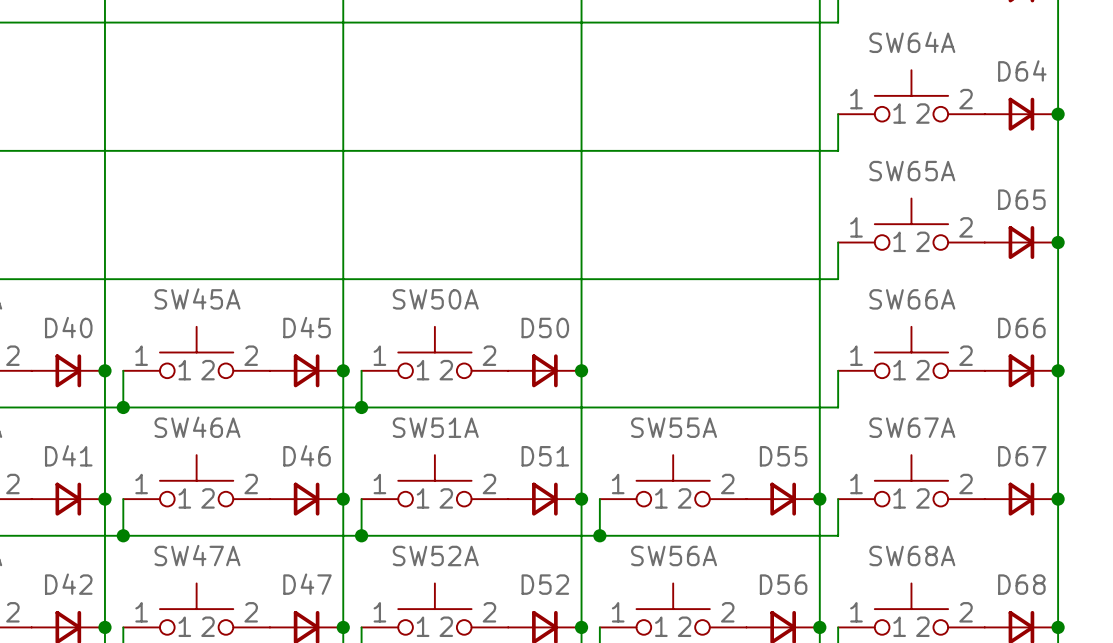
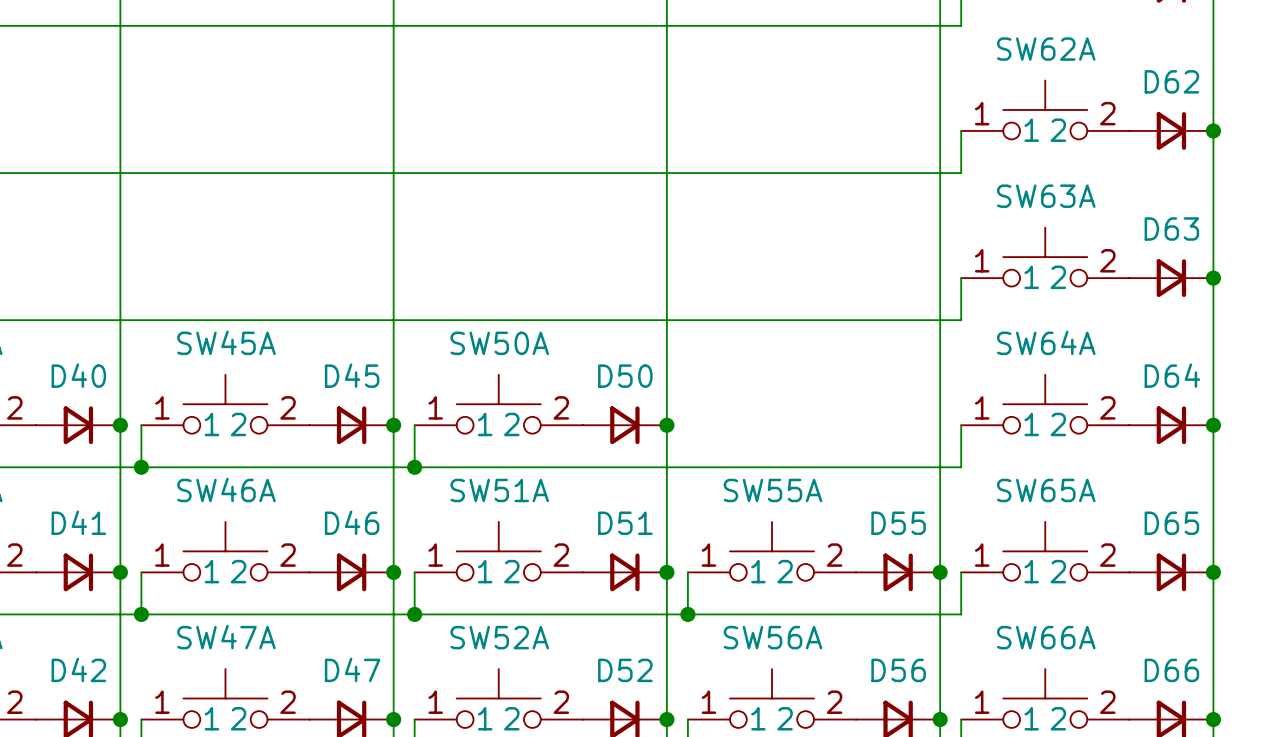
SW64A name: SW64A (912, 42) -> SW62A (1046, 49)
D64 name: D64 (1022, 70) -> D62 (1171, 81)
SW65A name: SW65A (912, 171) -> SW63A (1046, 196)
D65 name: D65 (1021, 199) -> D63 (1171, 228)
SW66A name: SW66A (912, 299) -> SW64A (1046, 342)
D66 name: D66 (1021, 327) -> D64 (1172, 375)
SW67A name: SW67A (912, 427) -> SW65A (1046, 490)
D67 name: D67 (1022, 456) -> D65 (1171, 523)
SW68A name: SW68A (912, 555) -> SW66A (1046, 637)
D68 name: D68 (1021, 584) -> D66 (1171, 670)

